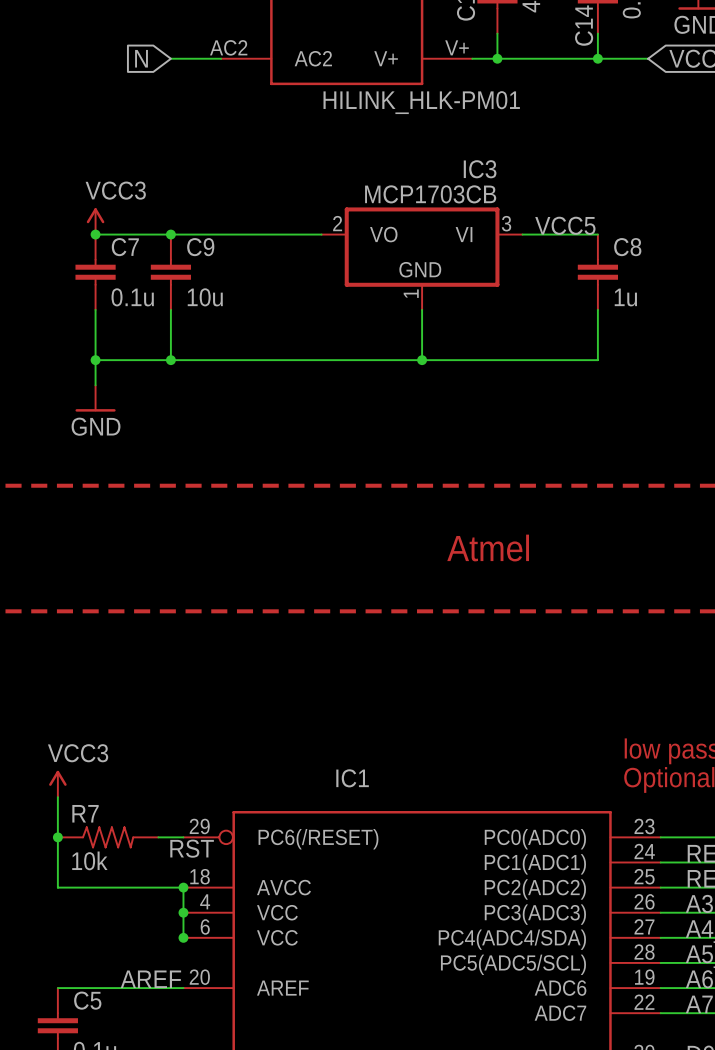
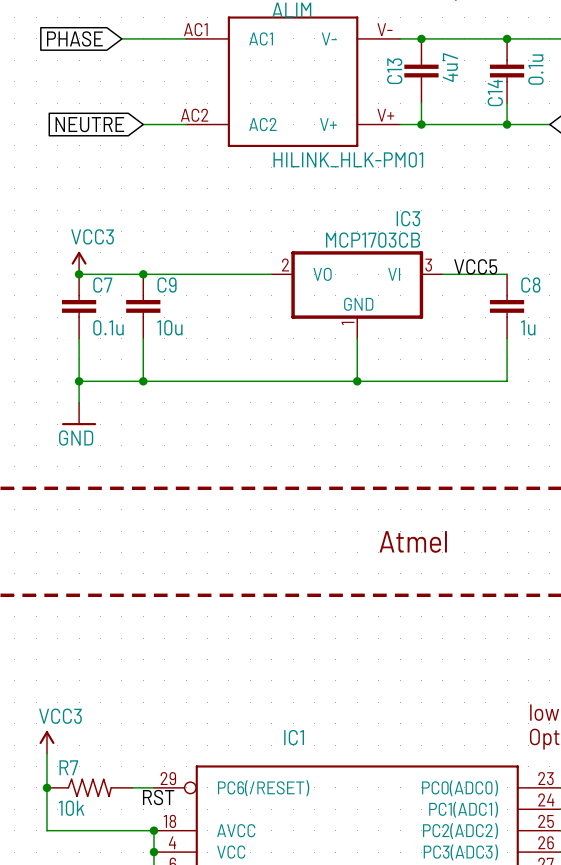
global label: N (141, 58) -> NEUTRE (89, 124)

